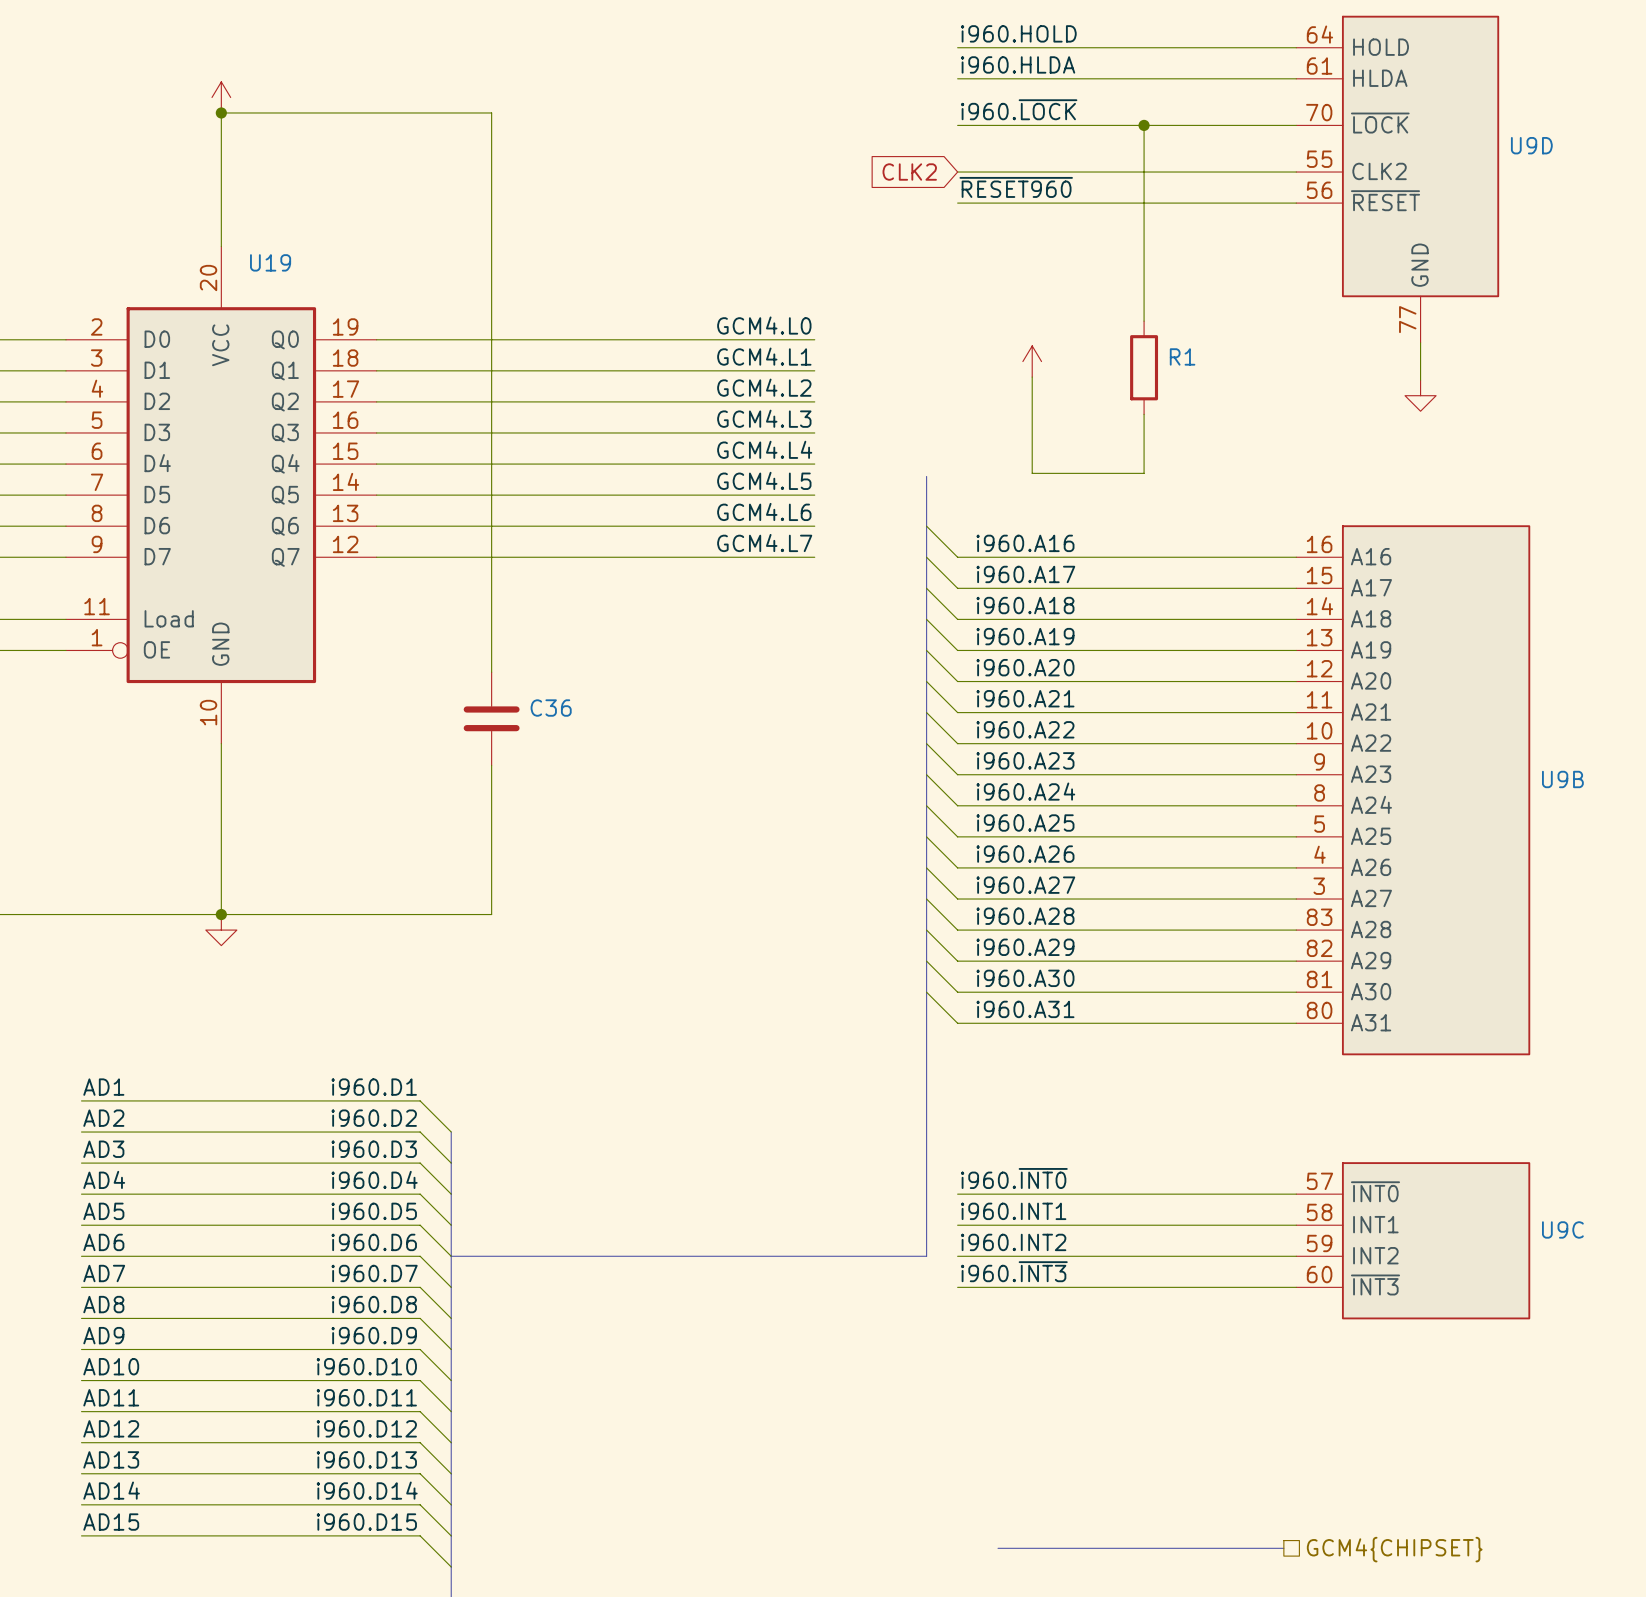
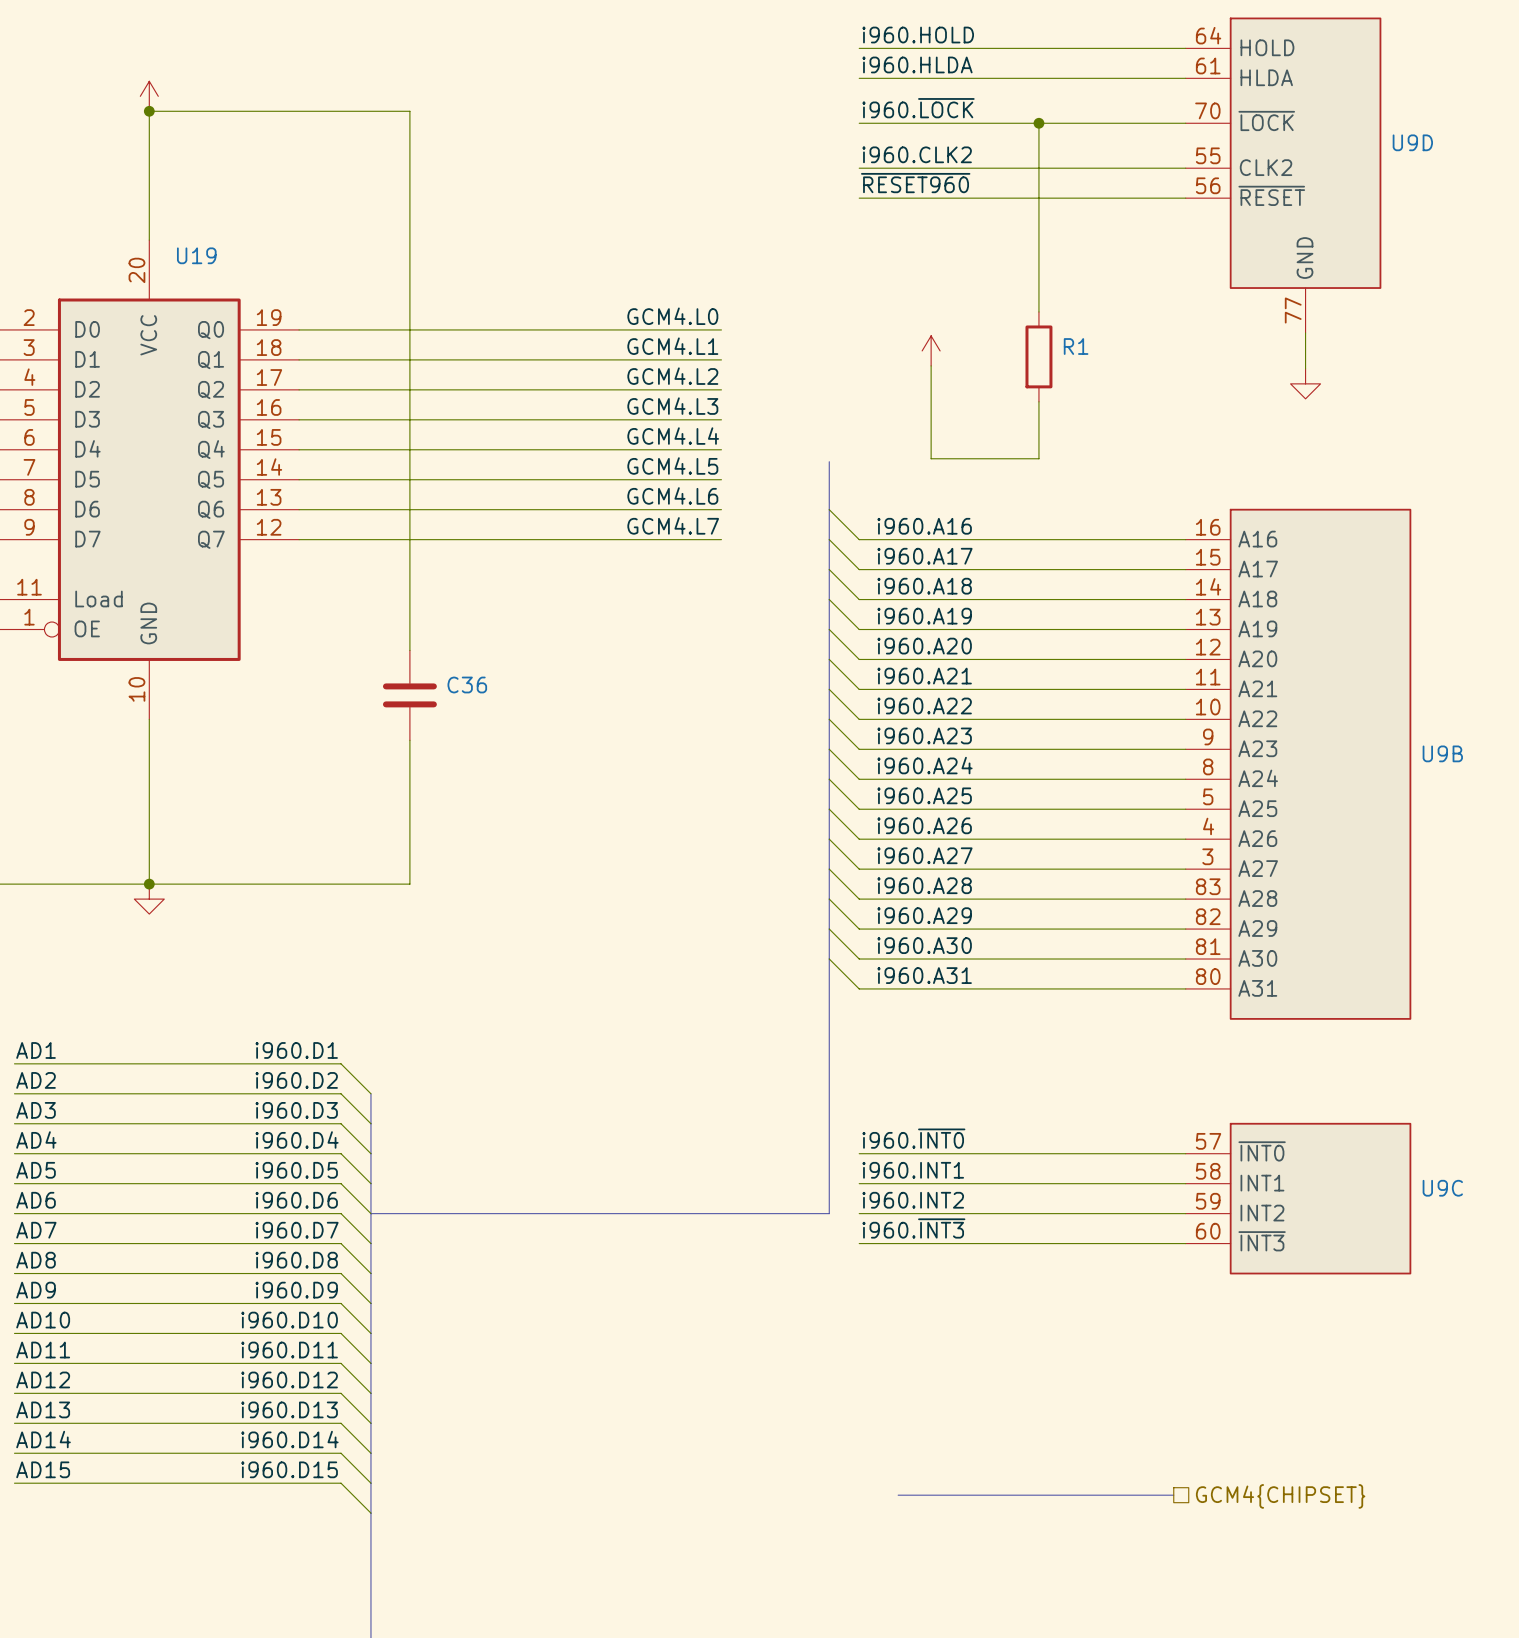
label: none -> i960.CLK2 (917, 154)
global label: CLK2 (909, 172) -> none

